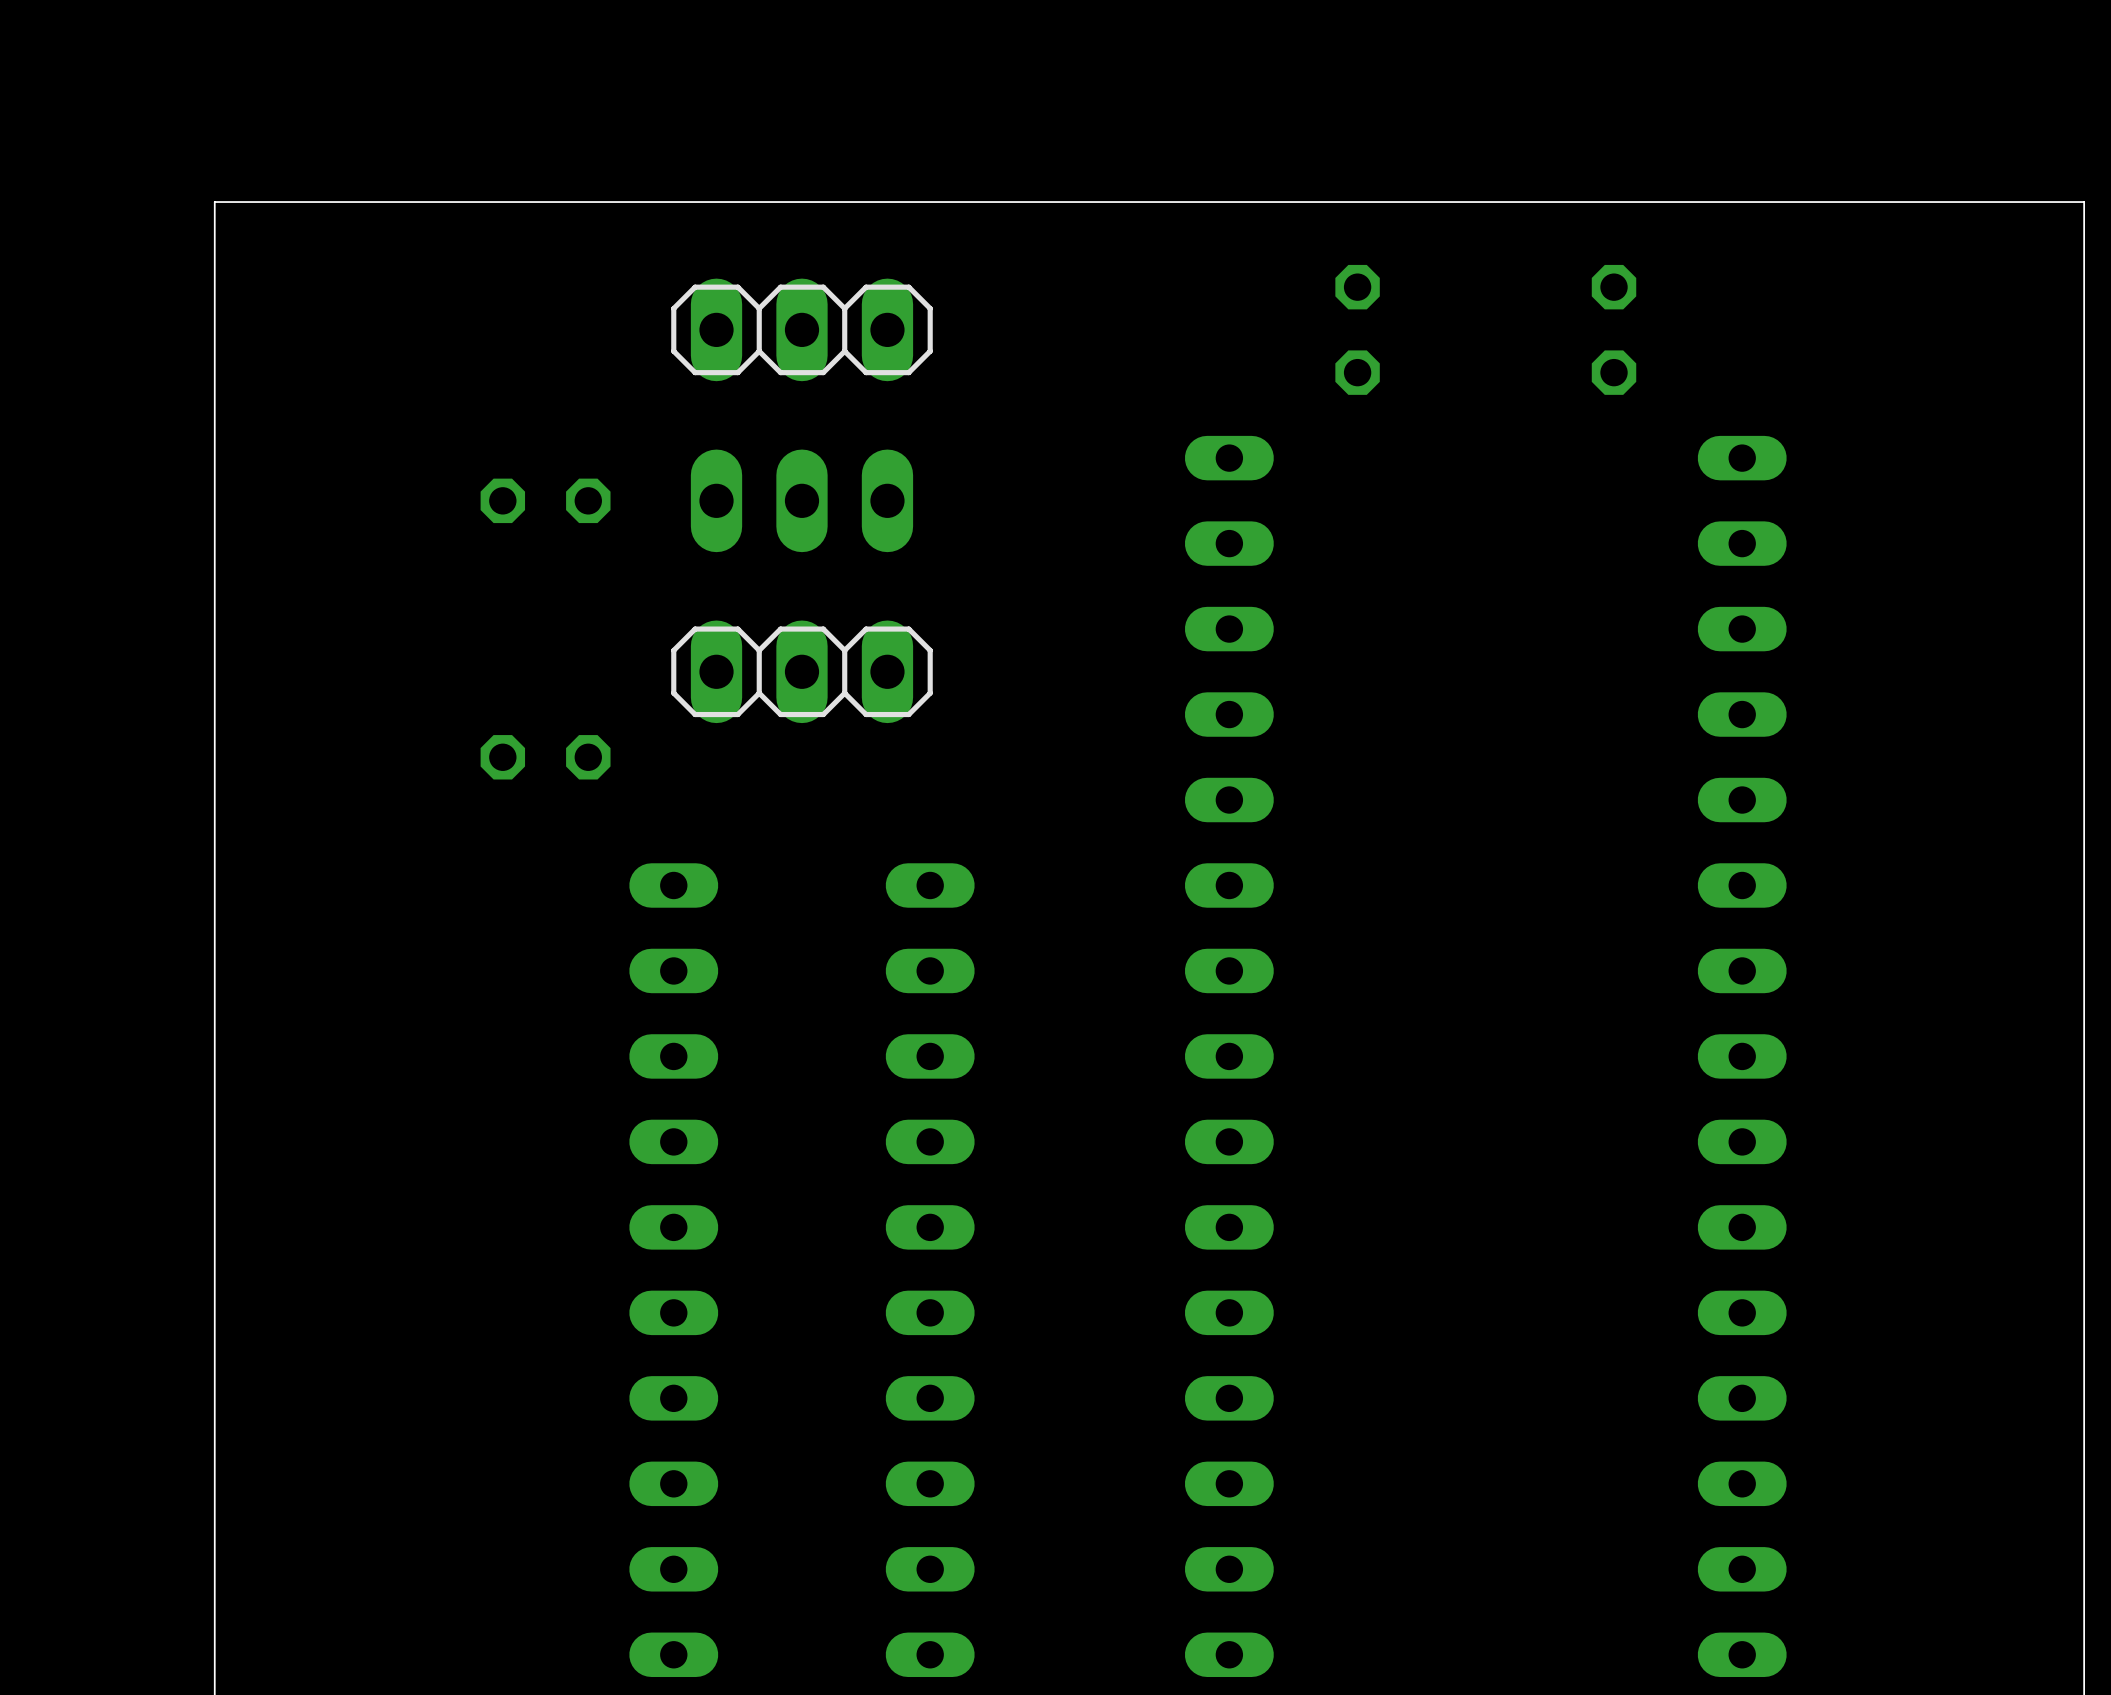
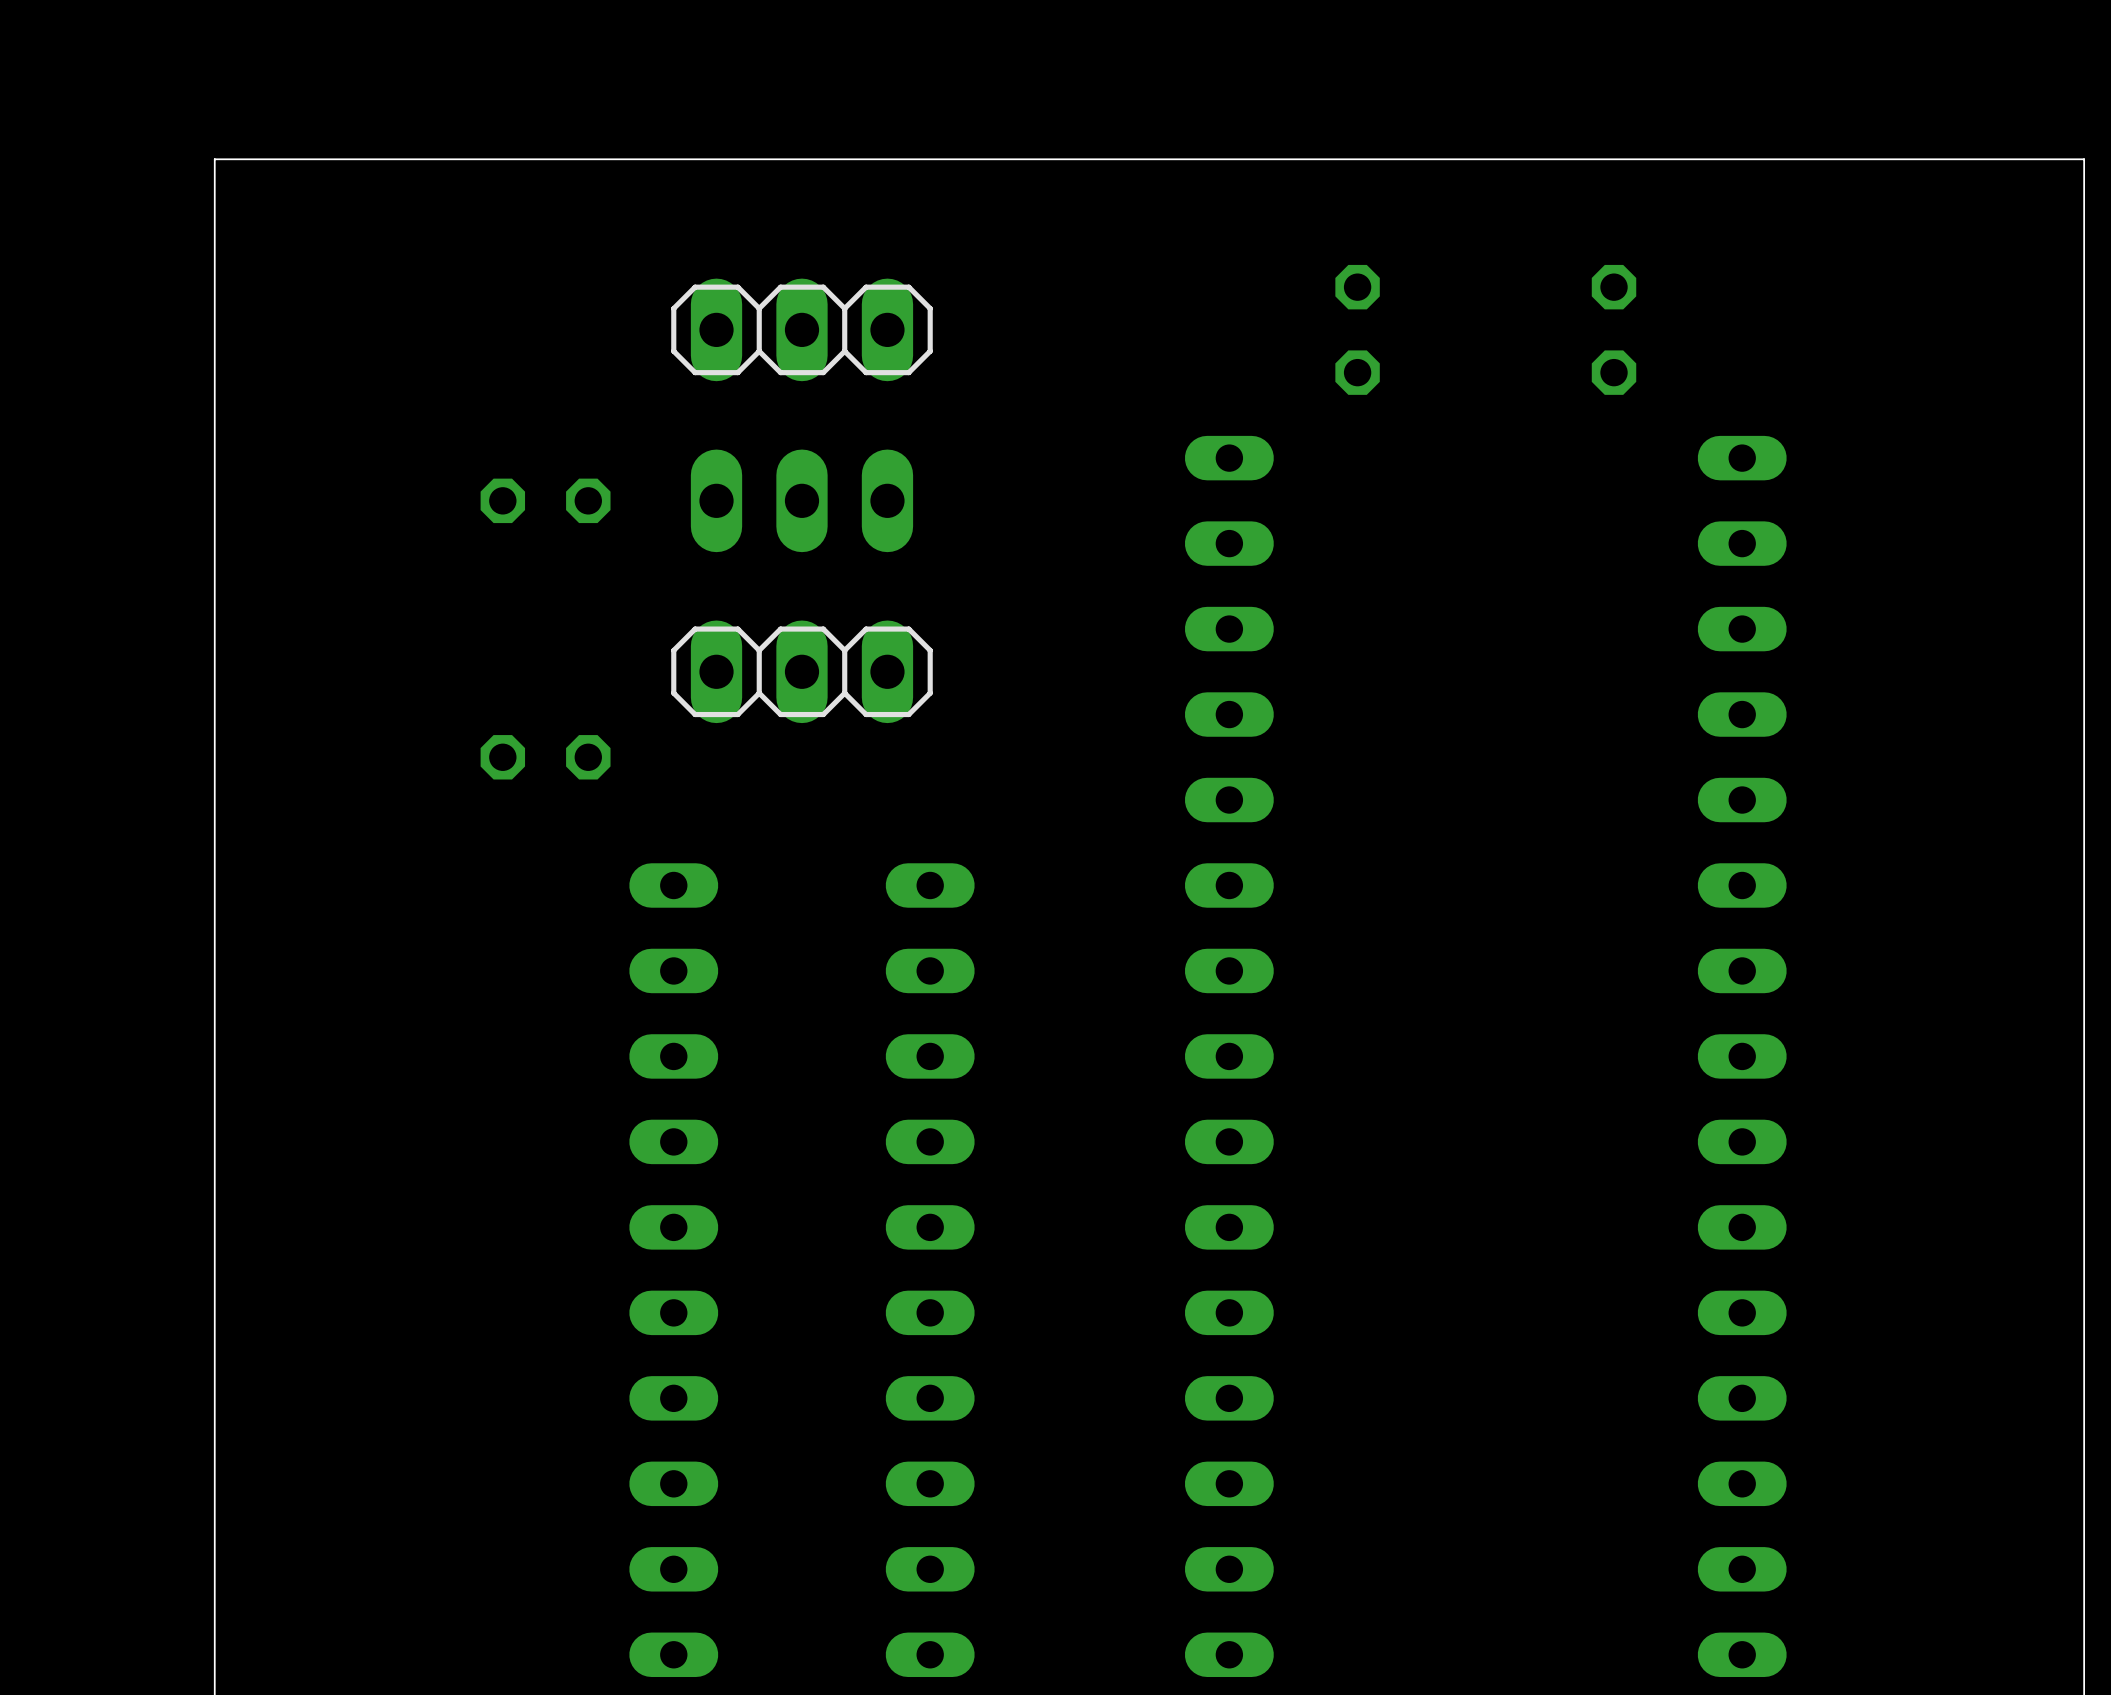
board edge: (2084, 202) (214, 202) -> (2084, 202) (2084, 159) (214, 159) (214, 202)

